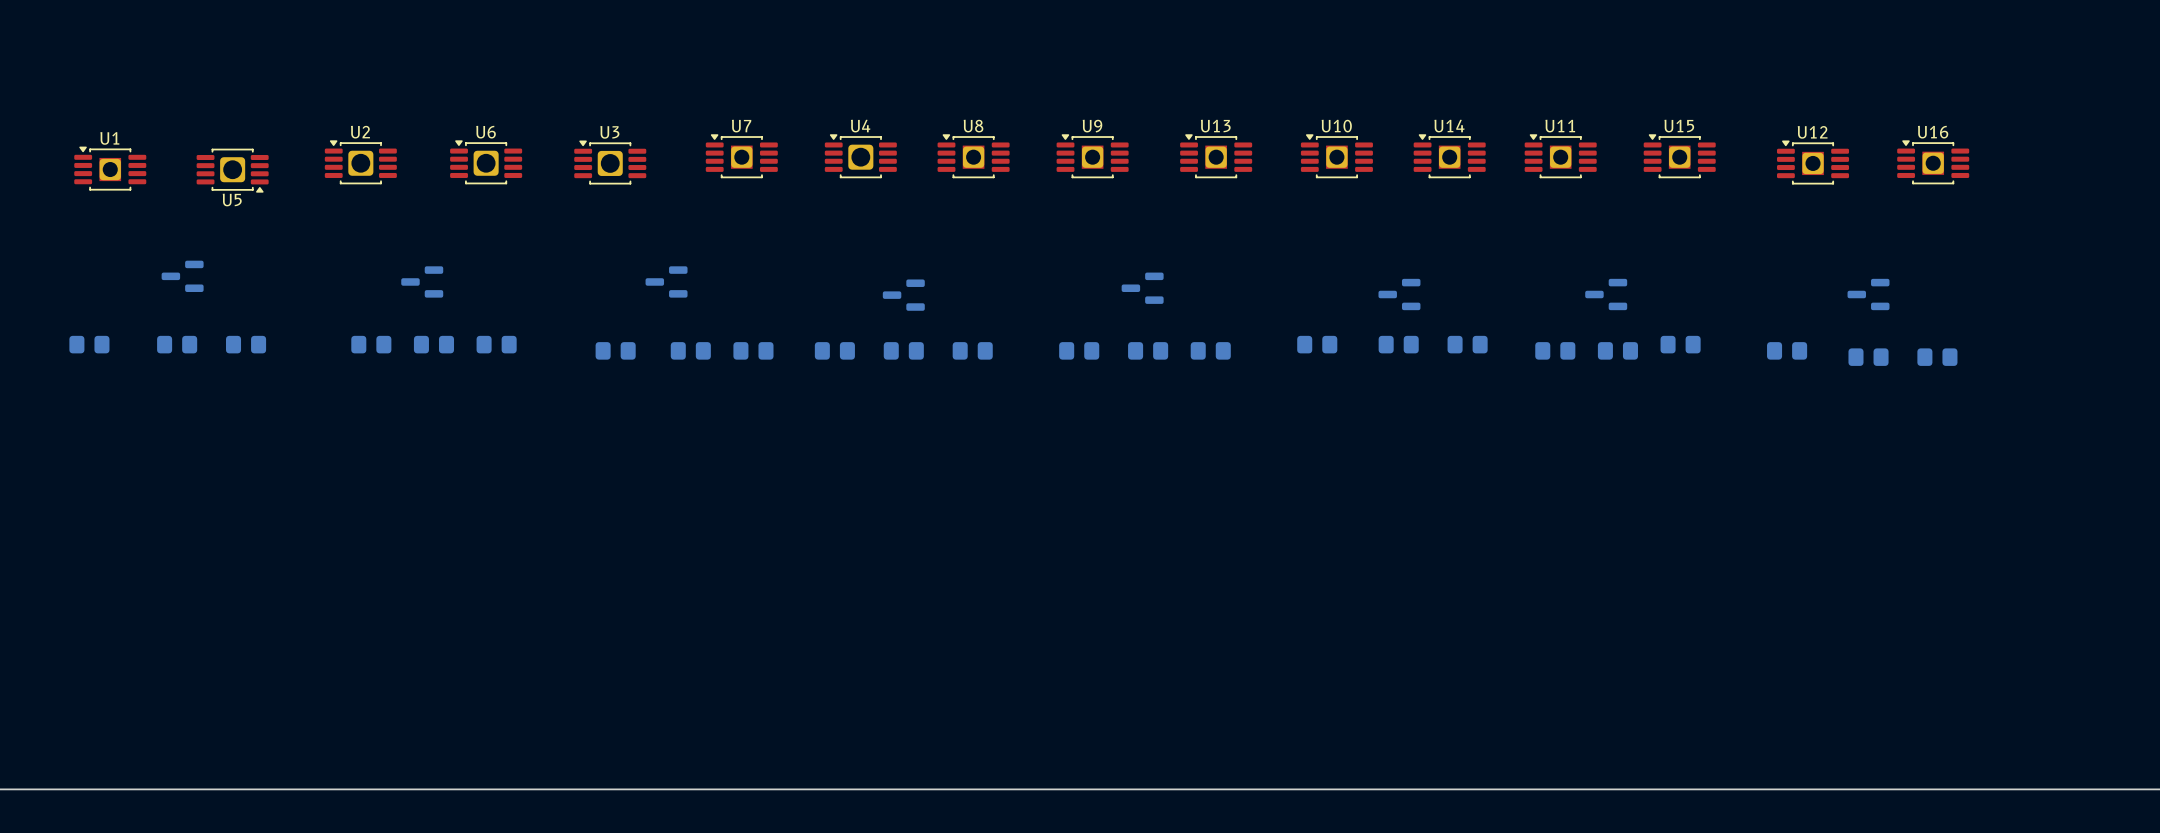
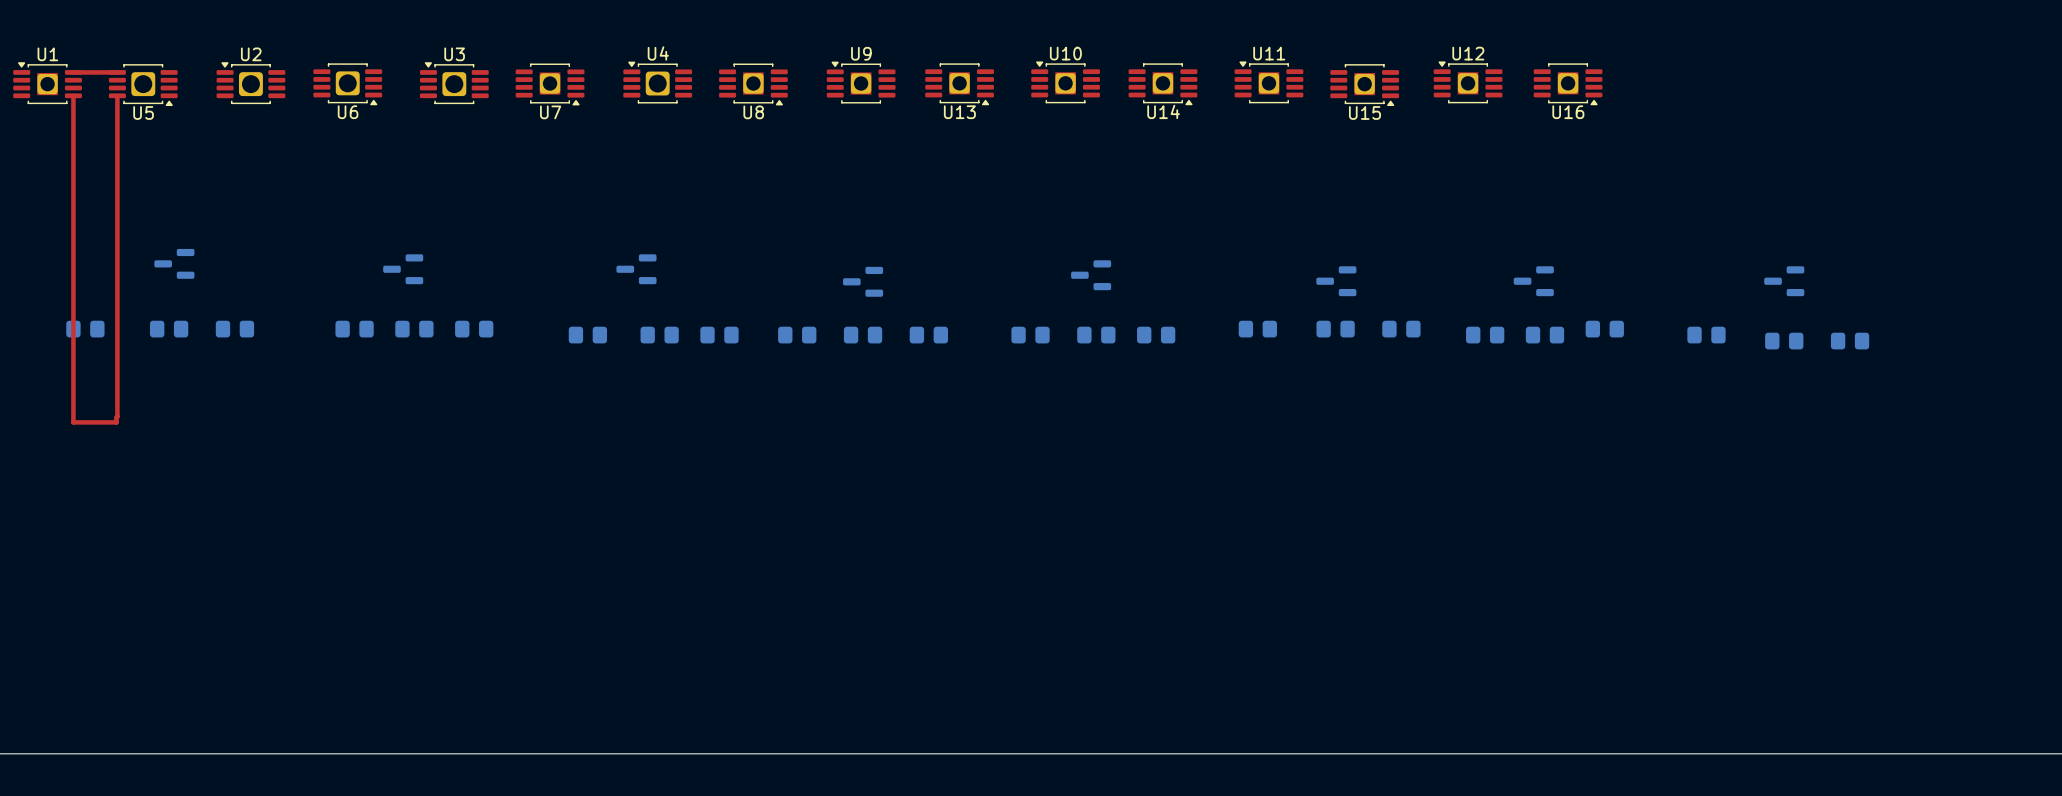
top track: none -> (73, 72) (117, 72)
top track: none -> (73, 95) (73, 422) (116, 422) (117, 416) (117, 95)
U7 rotation: 0° (741, 156) -> 180° (550, 84)
U7 position: (741, 156) -> (550, 84)
U4 position: (860, 156) -> (657, 82)
U8 rotation: 0° (973, 156) -> 180° (753, 84)
U8 position: (973, 156) -> (753, 84)
U9 position: (1092, 156) -> (861, 82)
U13 rotation: 0° (1216, 156) -> 180° (959, 84)
U13 position: (1216, 156) -> (959, 84)
U10 position: (1336, 156) -> (1065, 82)
U14 rotation: 0° (1449, 156) -> 180° (1162, 84)
U14 position: (1449, 156) -> (1162, 84)
U11 position: (1560, 156) -> (1268, 82)
U15 rotation: 0° (1679, 156) -> 180° (1364, 85)
U15 position: (1679, 156) -> (1364, 85)
U2 position: (360, 162) -> (250, 83)
U6 rotation: 0° (486, 162) -> 180° (347, 84)
U6 position: (486, 162) -> (347, 84)
U3 position: (610, 162) -> (454, 83)
U12 position: (1813, 162) -> (1468, 82)
U16 rotation: 0° (1933, 162) -> 180° (1568, 84)
U16 position: (1933, 162) -> (1568, 84)
U1 position: (110, 168) -> (47, 83)
U5 position: (232, 170) -> (143, 85)

